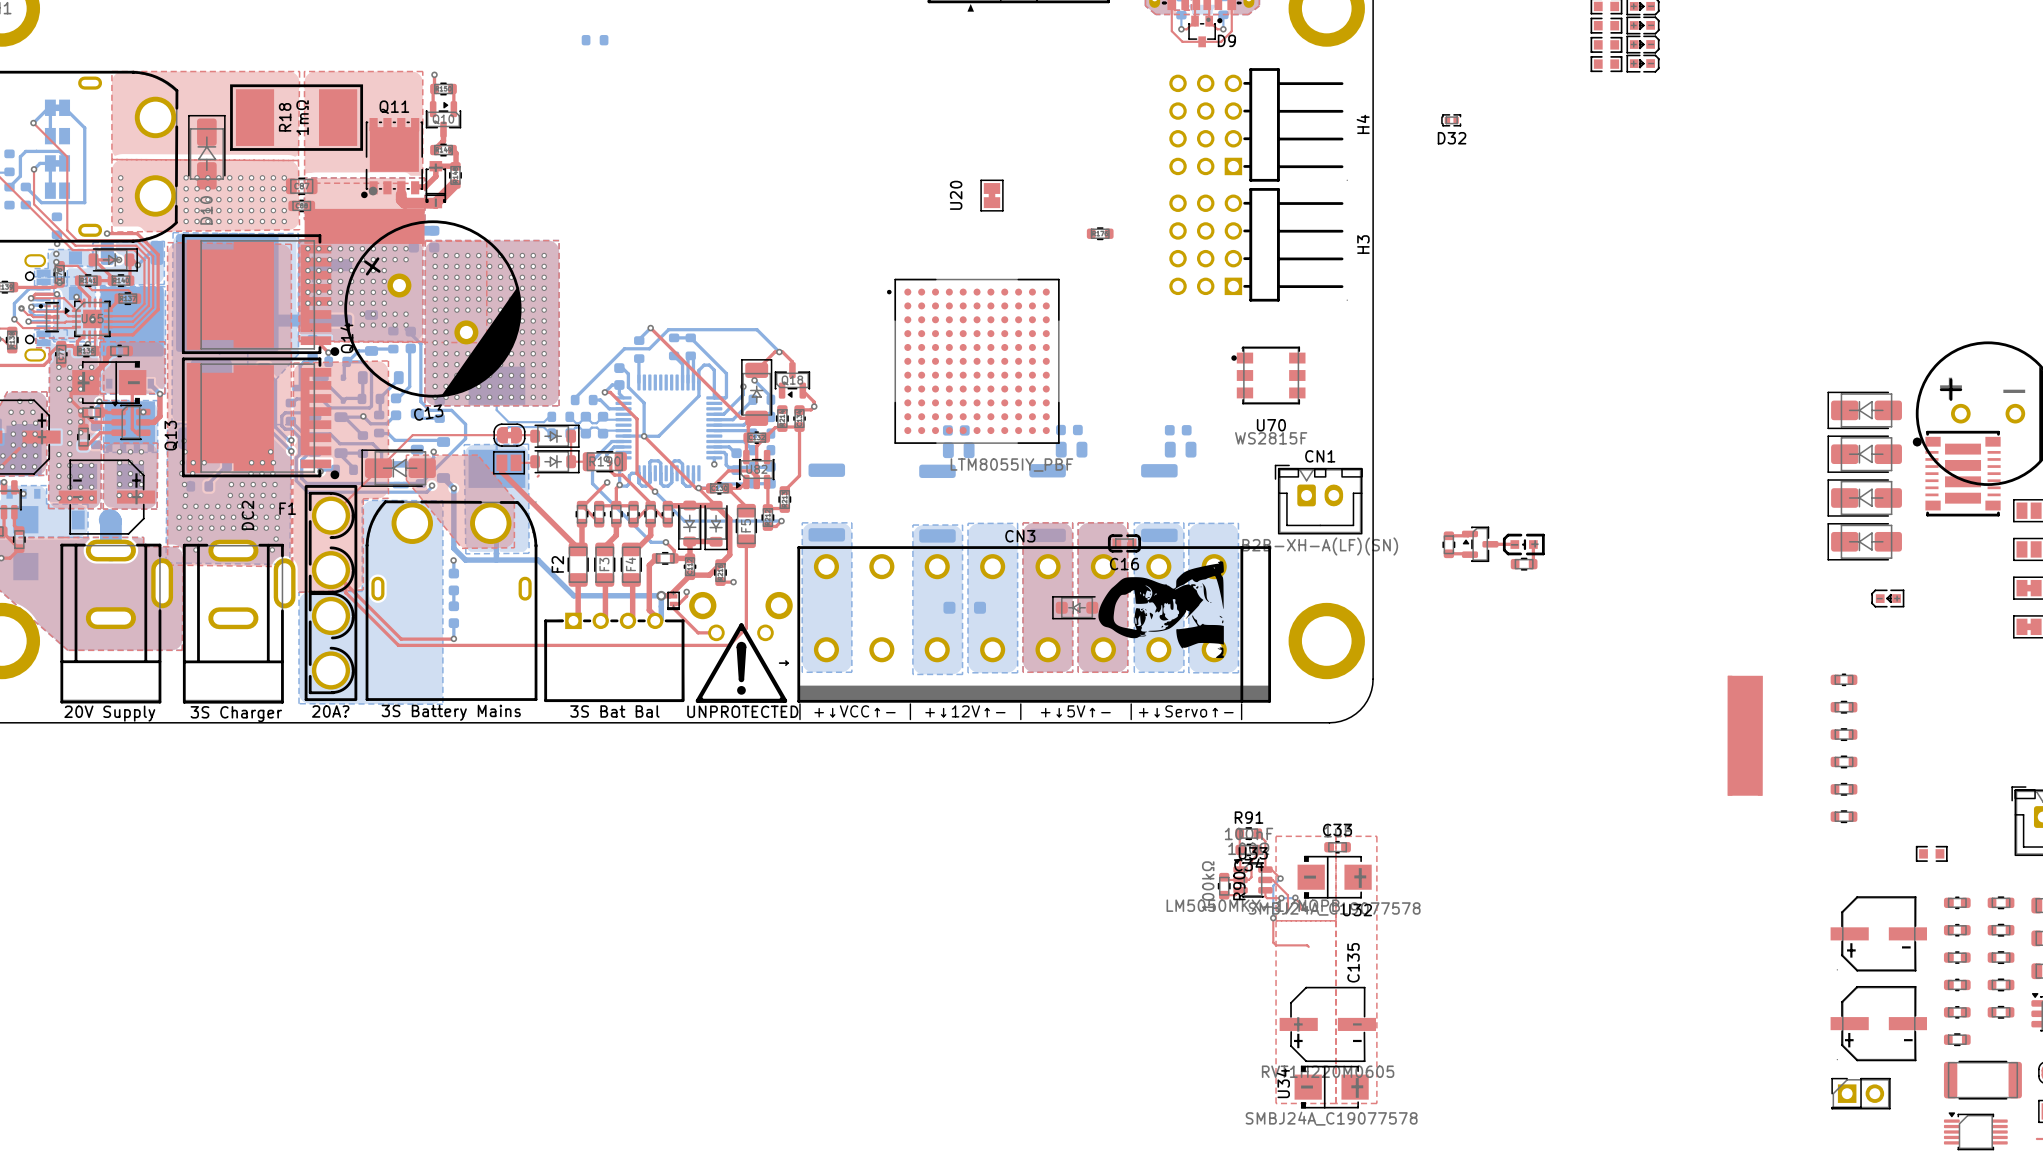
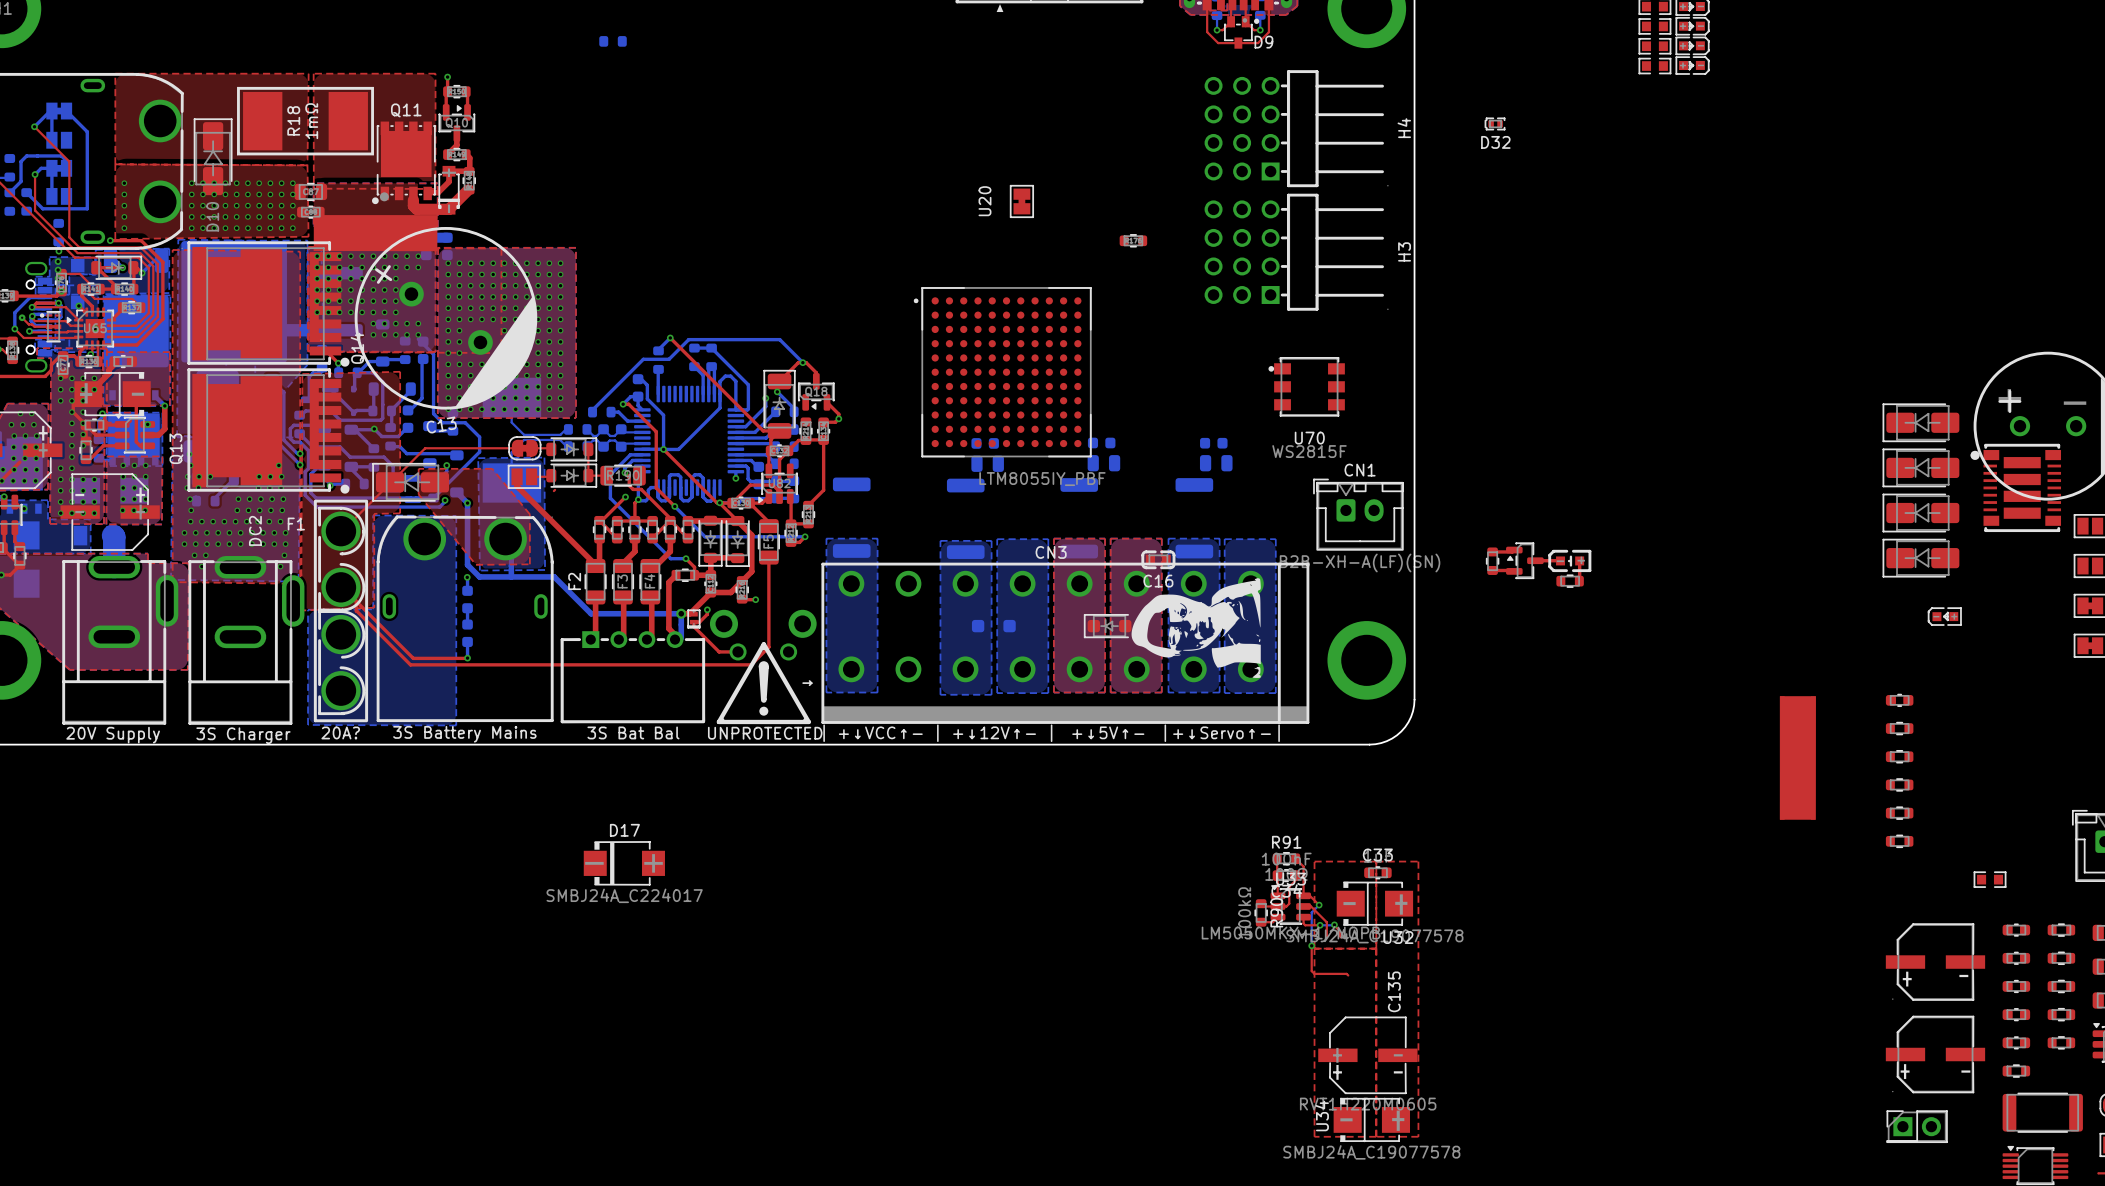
D17: none -> SMBJ24A_C224017 (624, 863)

